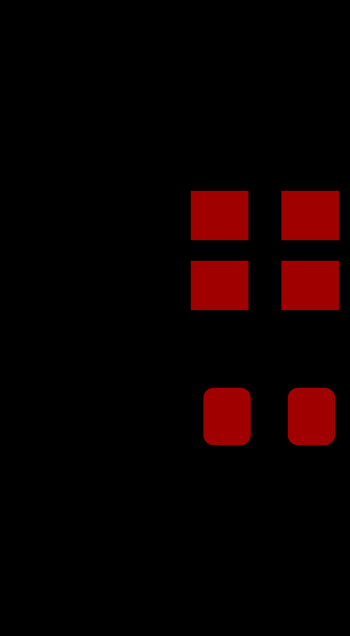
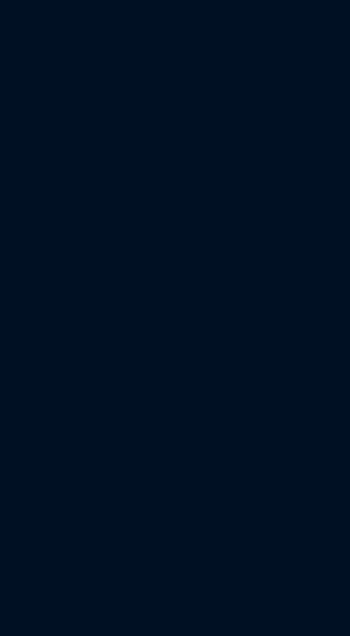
part: (264, 250) -> none
part: (269, 416) -> none

